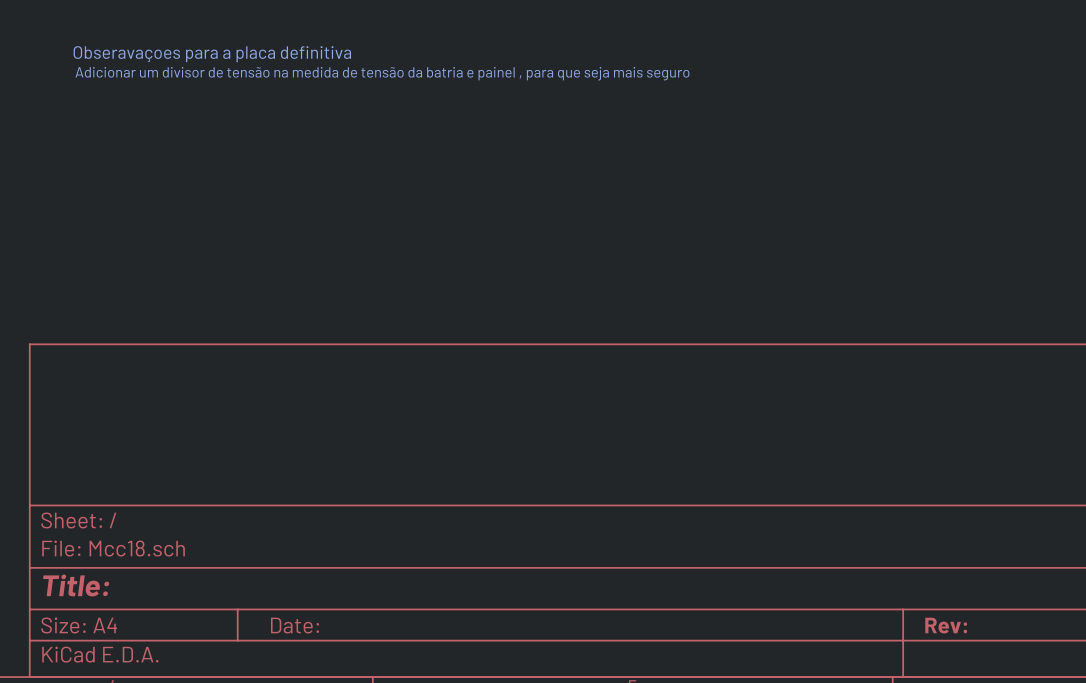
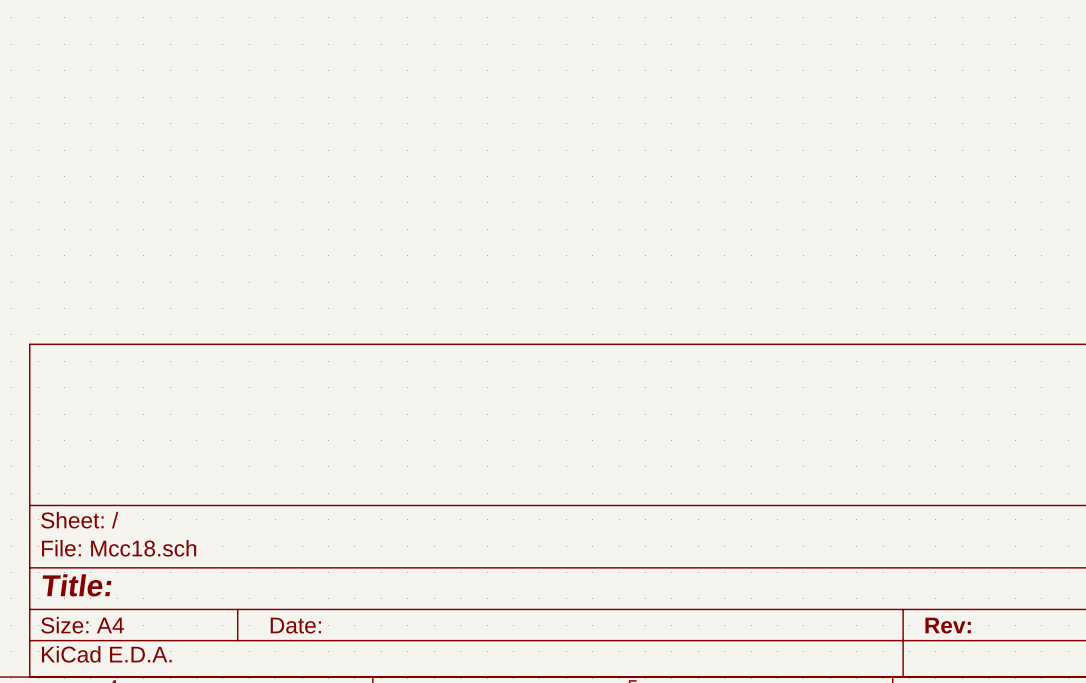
text: Obseravaçoes para a placa definitiva (212, 54) -> none
text: Adicionar um divisor de tensão na medida de tensão da batria e painel , para que seja mais seguro (382, 73) -> none

